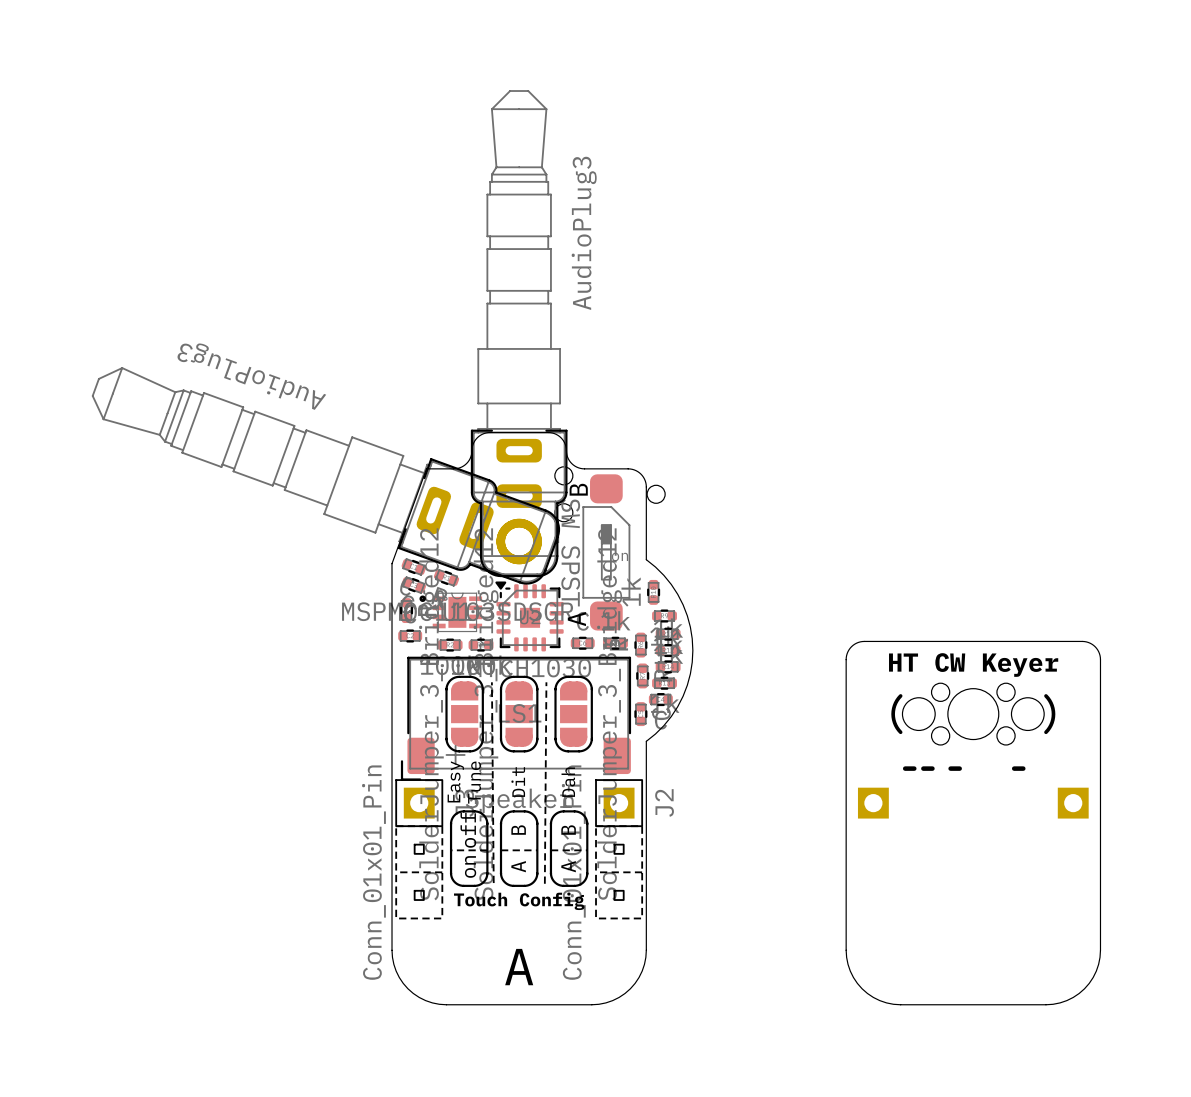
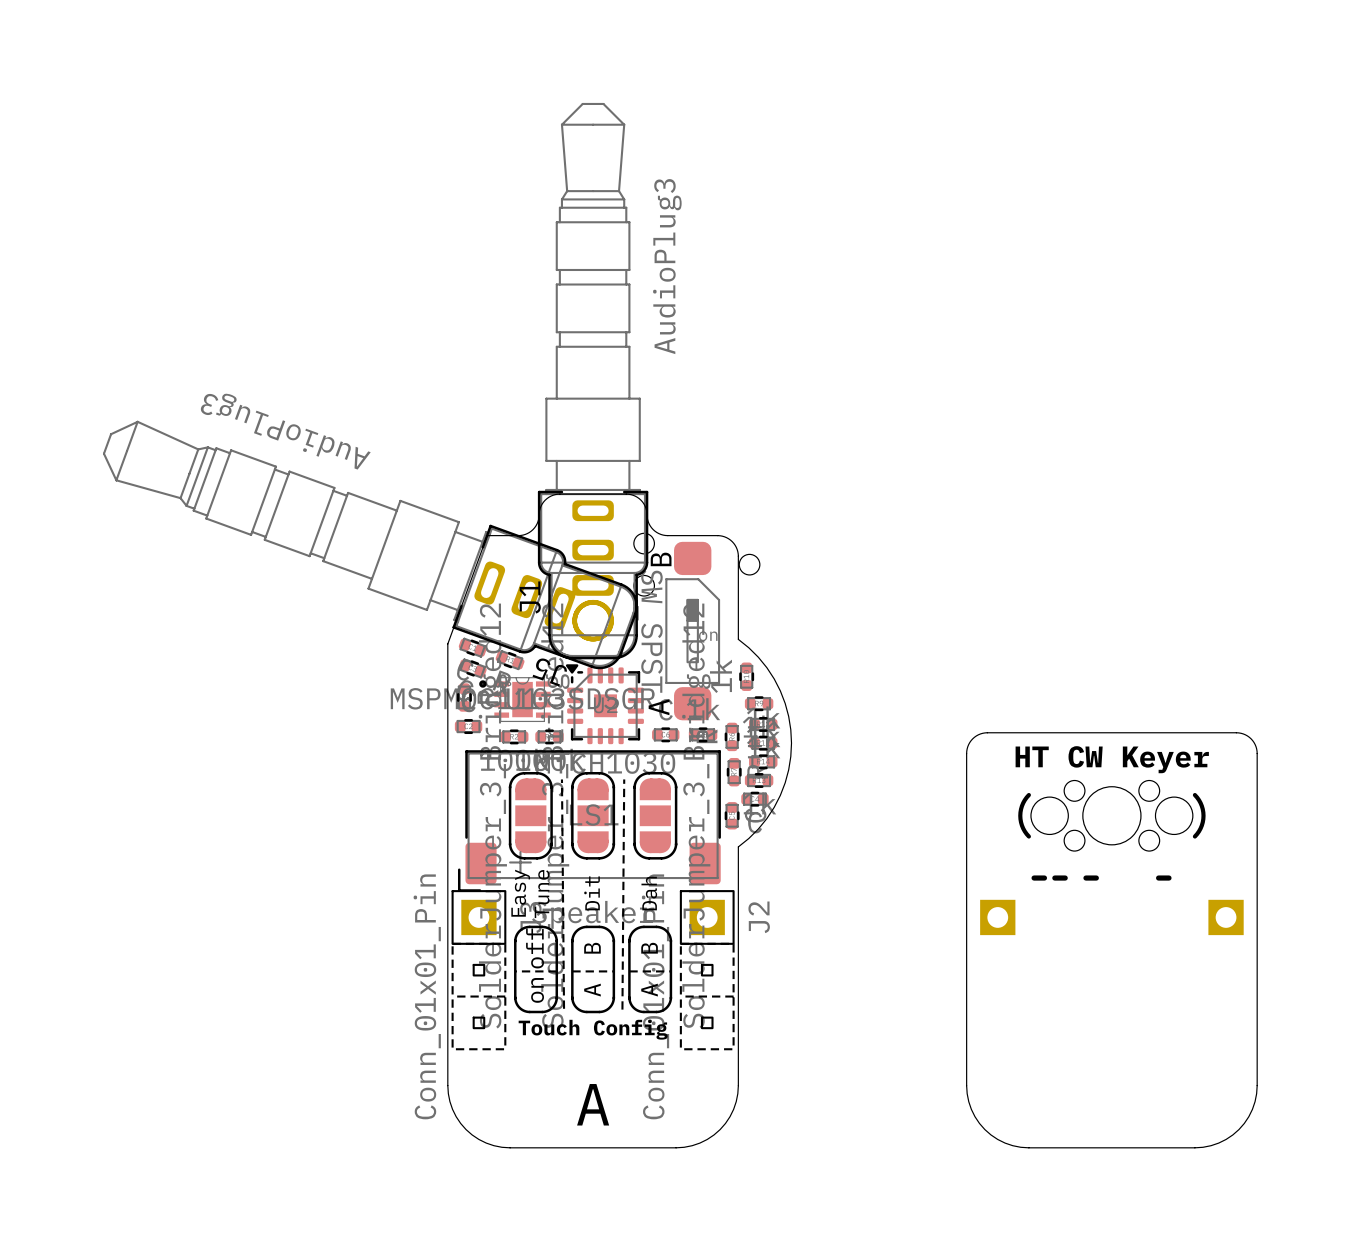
part: AudioPlug3 (519, 333) -> none
J1: none -> AudioPlug3 (593, 381)
part: AudioPlug3 (325, 475) -> none
J5: none -> AudioPlug3 (370, 545)

